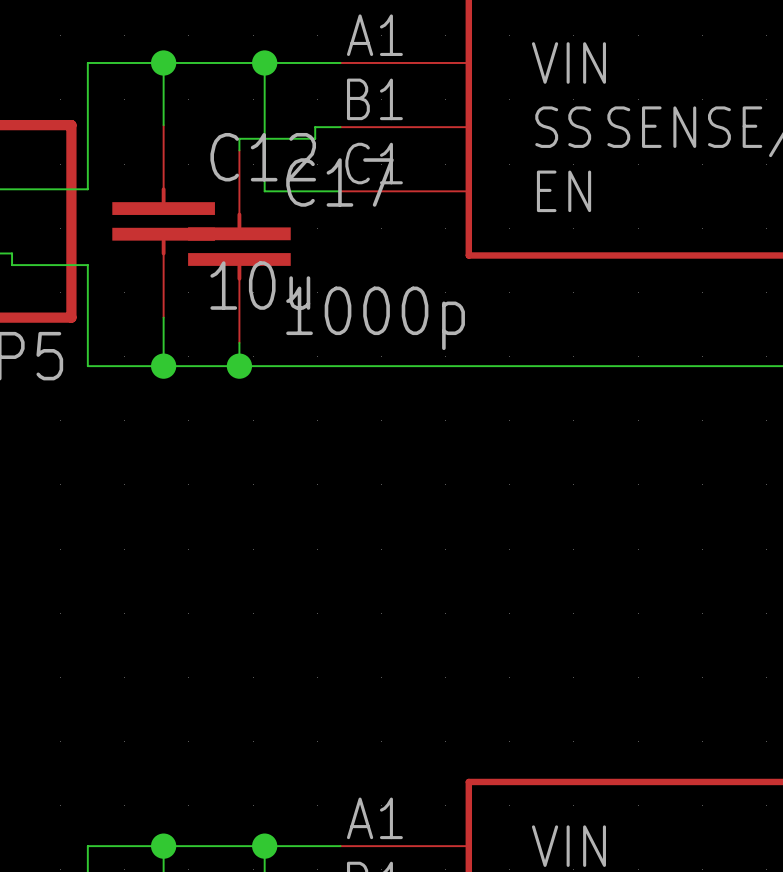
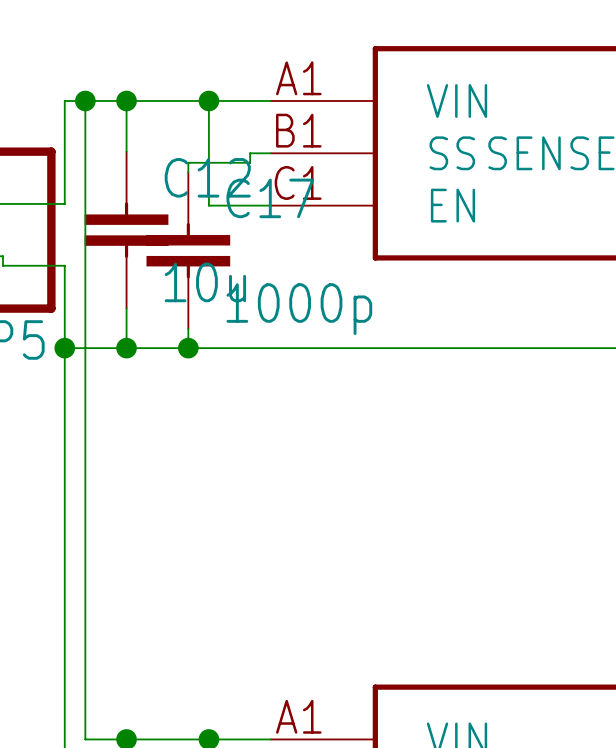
wire: none -> (85, 100) (85, 739)
junction: none -> (85, 100)
junction: none -> (64, 348)
wire: (87, 846) (113, 846) -> (64, 739) (64, 348)

